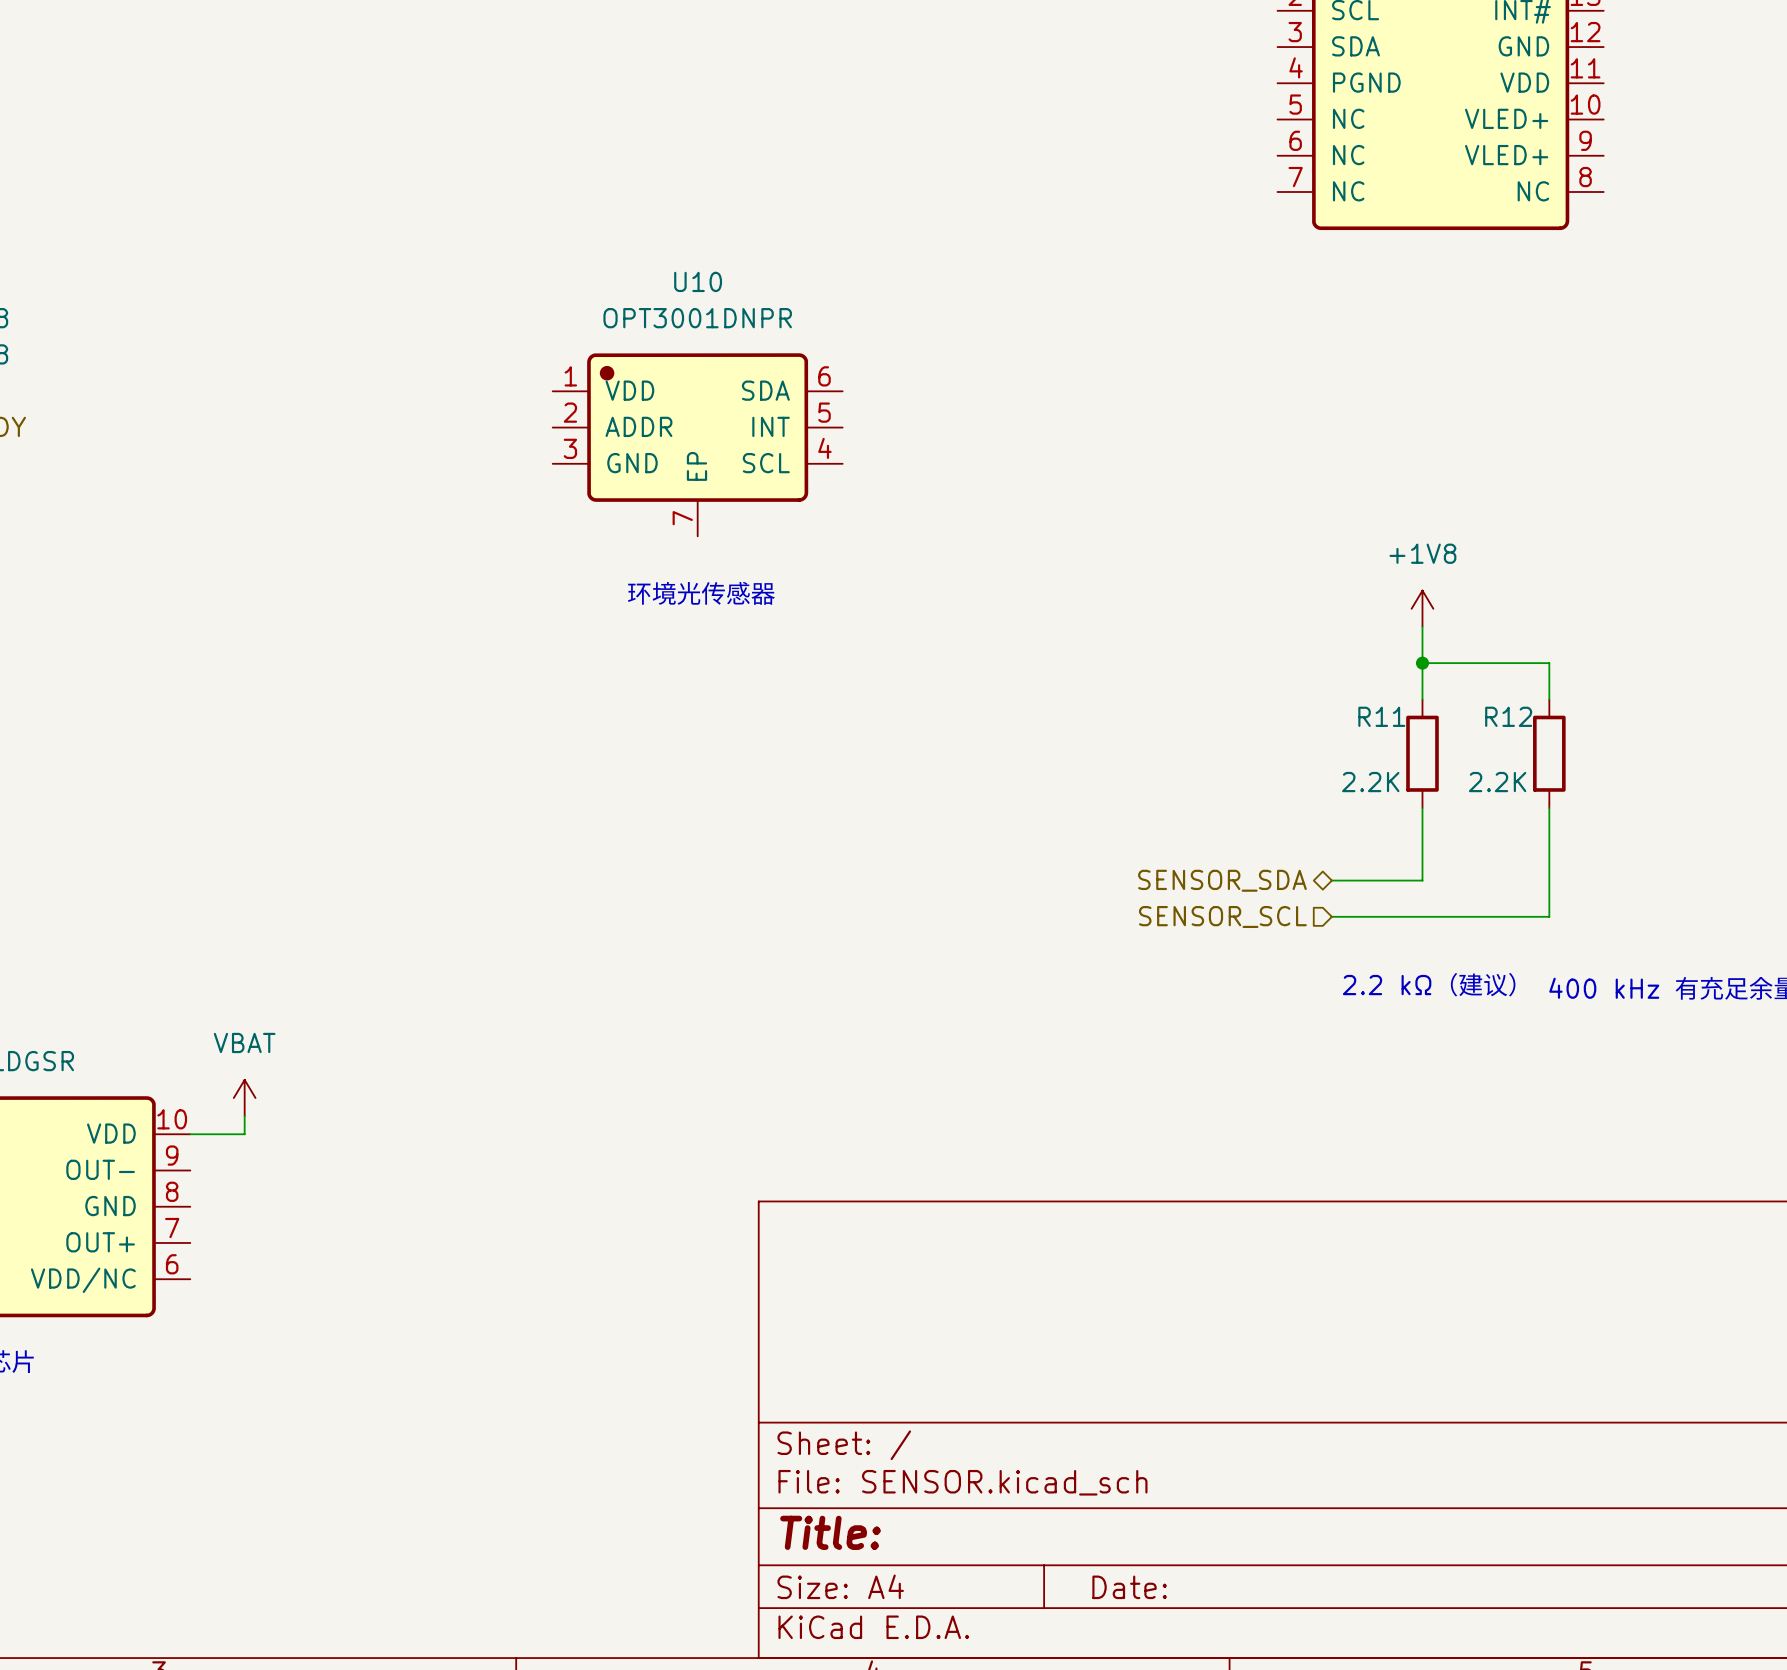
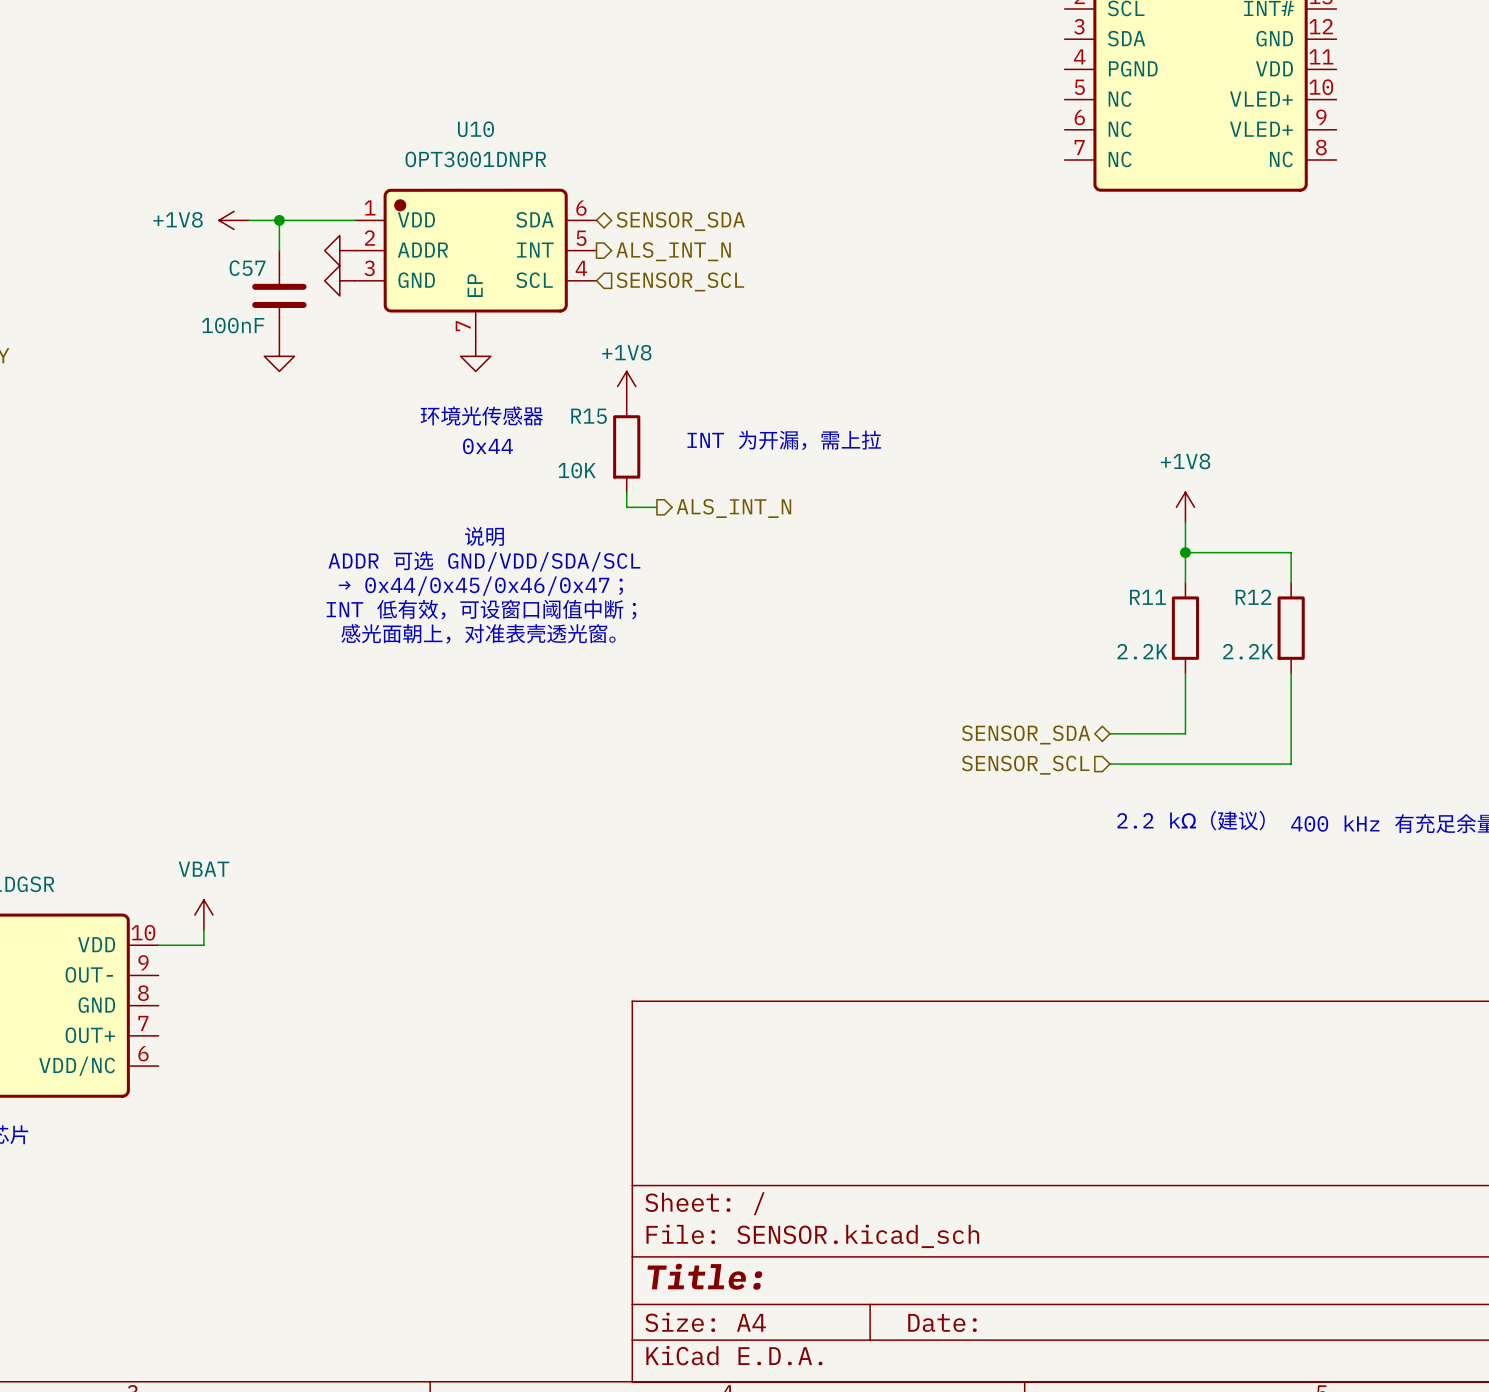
power symbol: none -> +1V8 (234, 220)
wire: none -> (249, 220) (354, 220)
wire: none -> (279, 220) (279, 250)
junction: none -> (279, 220)
hierarchical label: none -> SENSOR_SDA (680, 221)
power symbol: none -> (339, 250)
hierarchical label: none -> ALS_INT_N (673, 251)
power symbol: none -> (339, 280)
hierarchical label: none -> SENSOR_SCL (680, 281)
C57: none -> 100nF (279, 295)
power symbol: none -> (279, 356)
power symbol: none -> (475, 356)
U10 position: (697, 444) -> (475, 264)
power symbol: none -> +1V8 (626, 386)
text: none -> INT 为开漏，需上拉 (784, 440)
text: none -> 0x44 (487, 446)
R15: none -> 10K (626, 446)
wire: none -> (626, 492) (626, 507) (656, 507)
text position: 环境光传感器 (701, 593) -> 环境光传感器 (481, 415)
hierarchical label: none -> ALS_INT_N (733, 508)
text: none -> 说明 (484, 536)
text: none -> ADDR 可选 GND/VDD/SDA/SCL (484, 561)
text: none -> → 0x44/0x45/0x46/0x47； (480, 586)
text: none -> INT 低有效，可设窗口阈值中断； (481, 609)
text: none -> 感光面朝上，对准表壳透光窗。 (478, 633)

